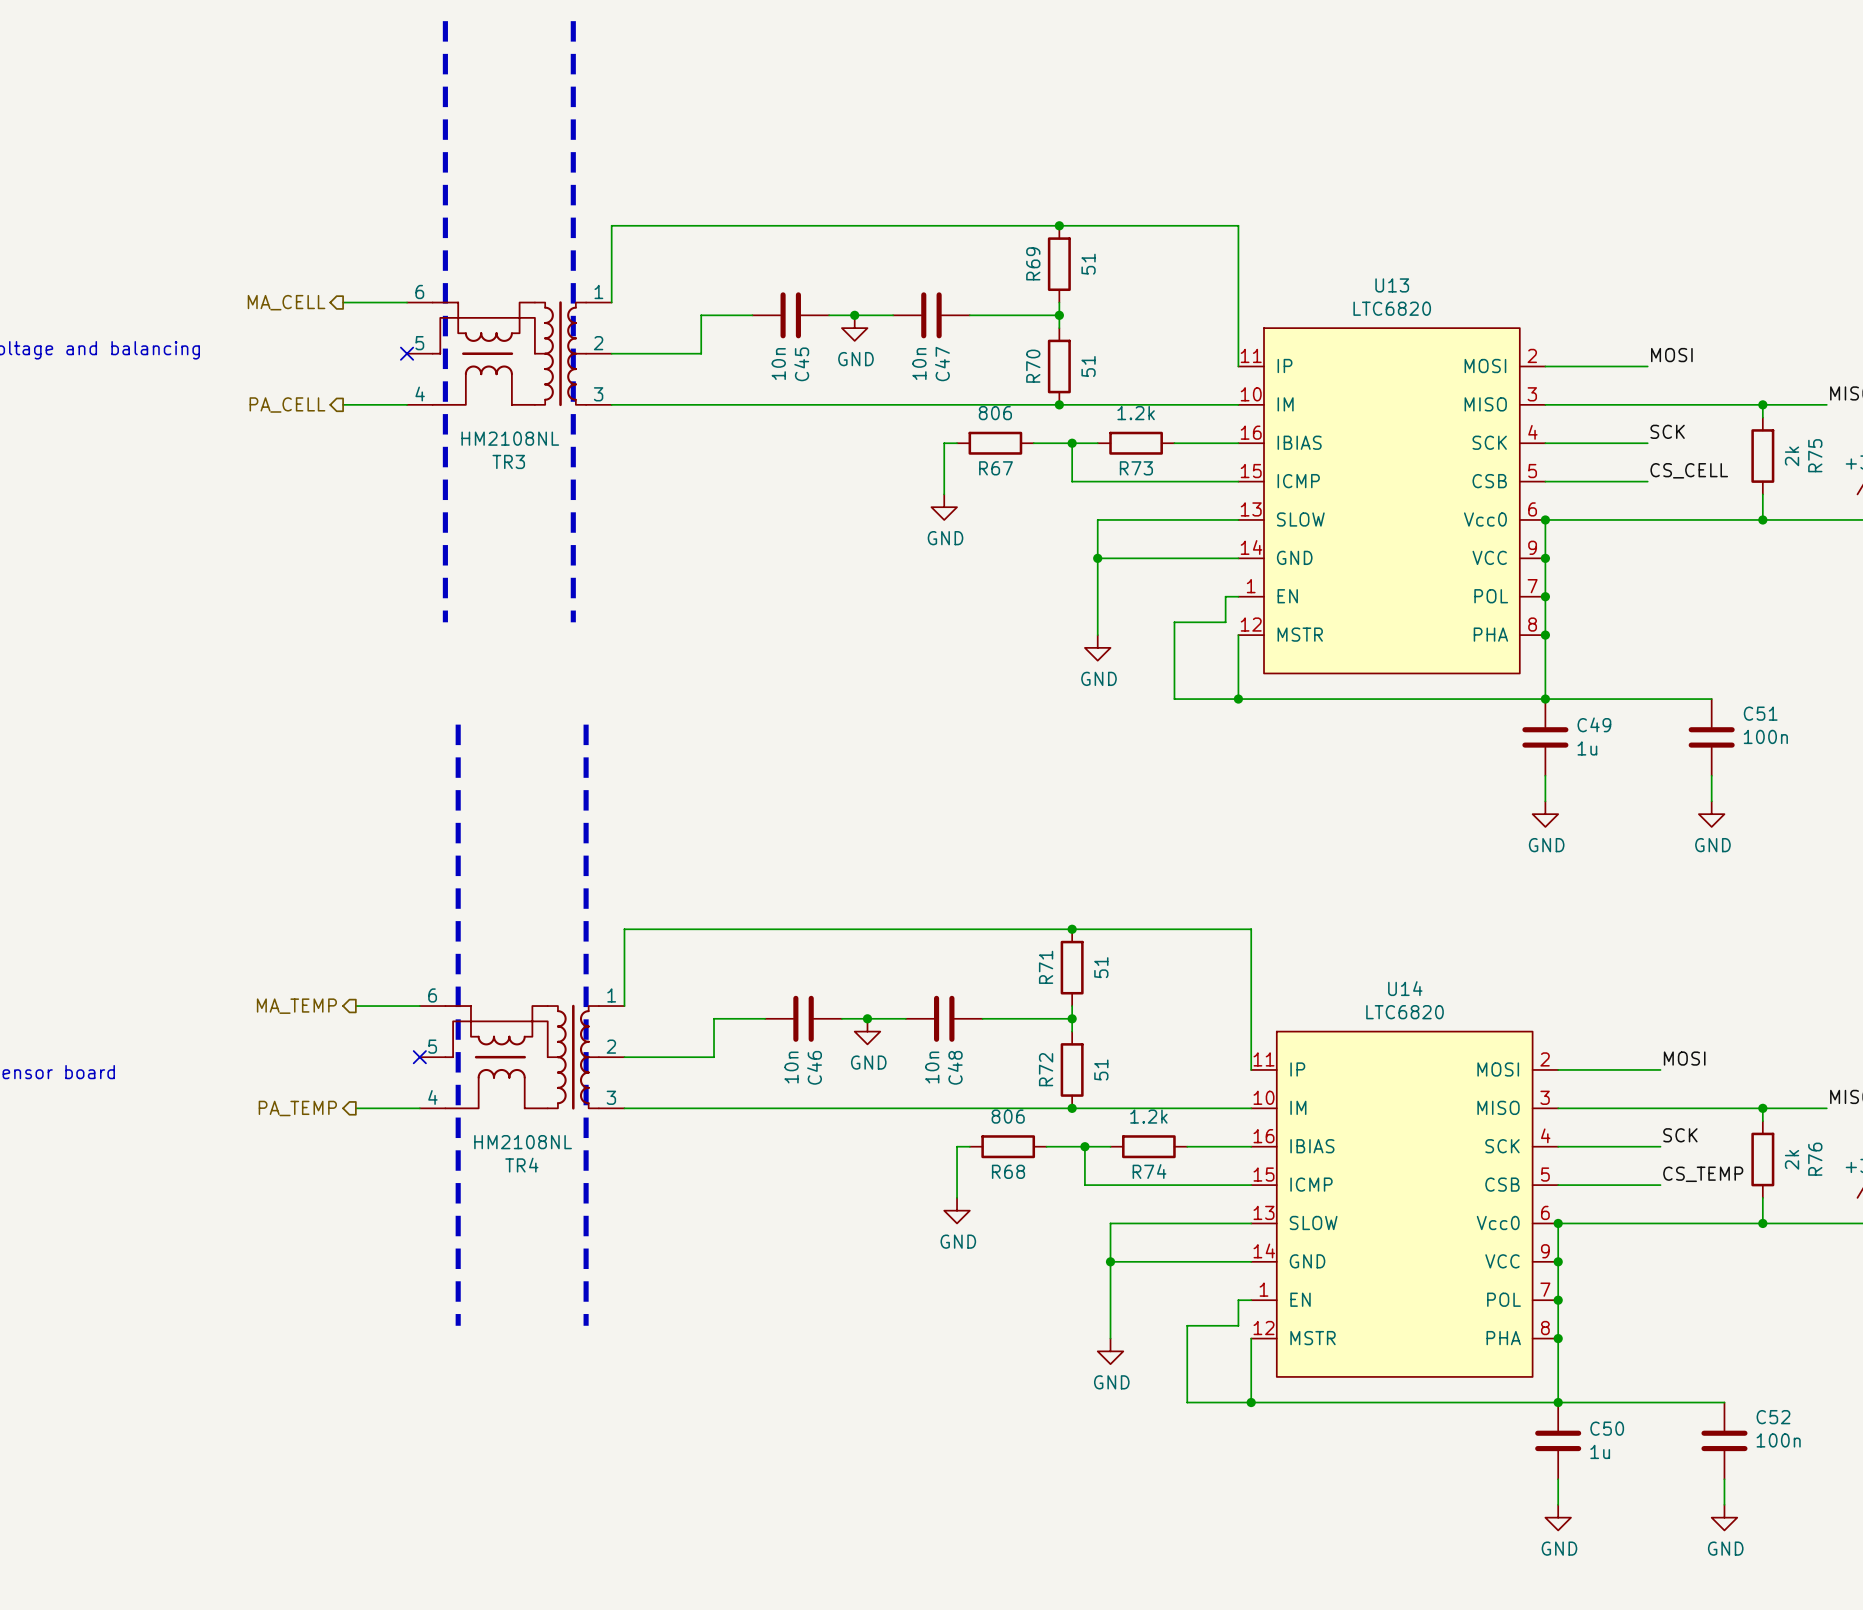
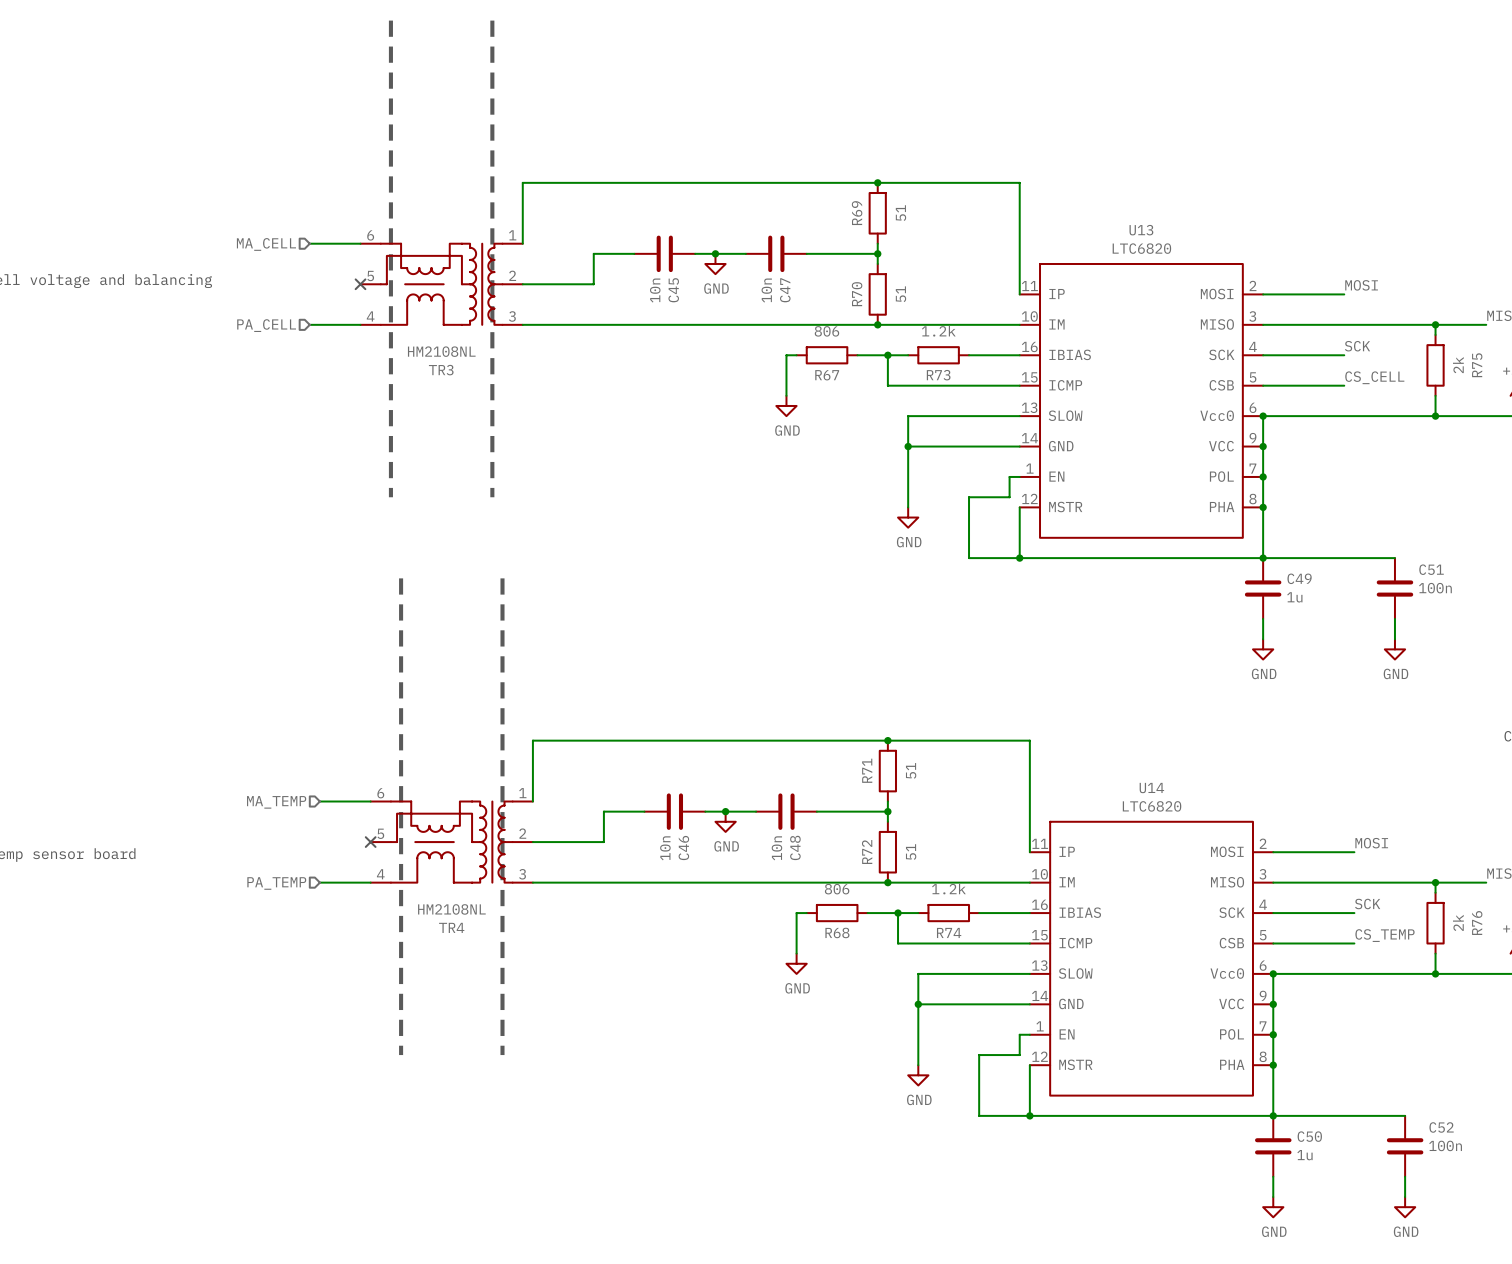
hierarchical label shape: output (286, 302) -> input (266, 244)
hierarchical label shape: output (287, 404) -> input (266, 325)
hierarchical label shape: output (296, 1006) -> input (276, 802)
hierarchical label shape: output (297, 1108) -> input (276, 883)

